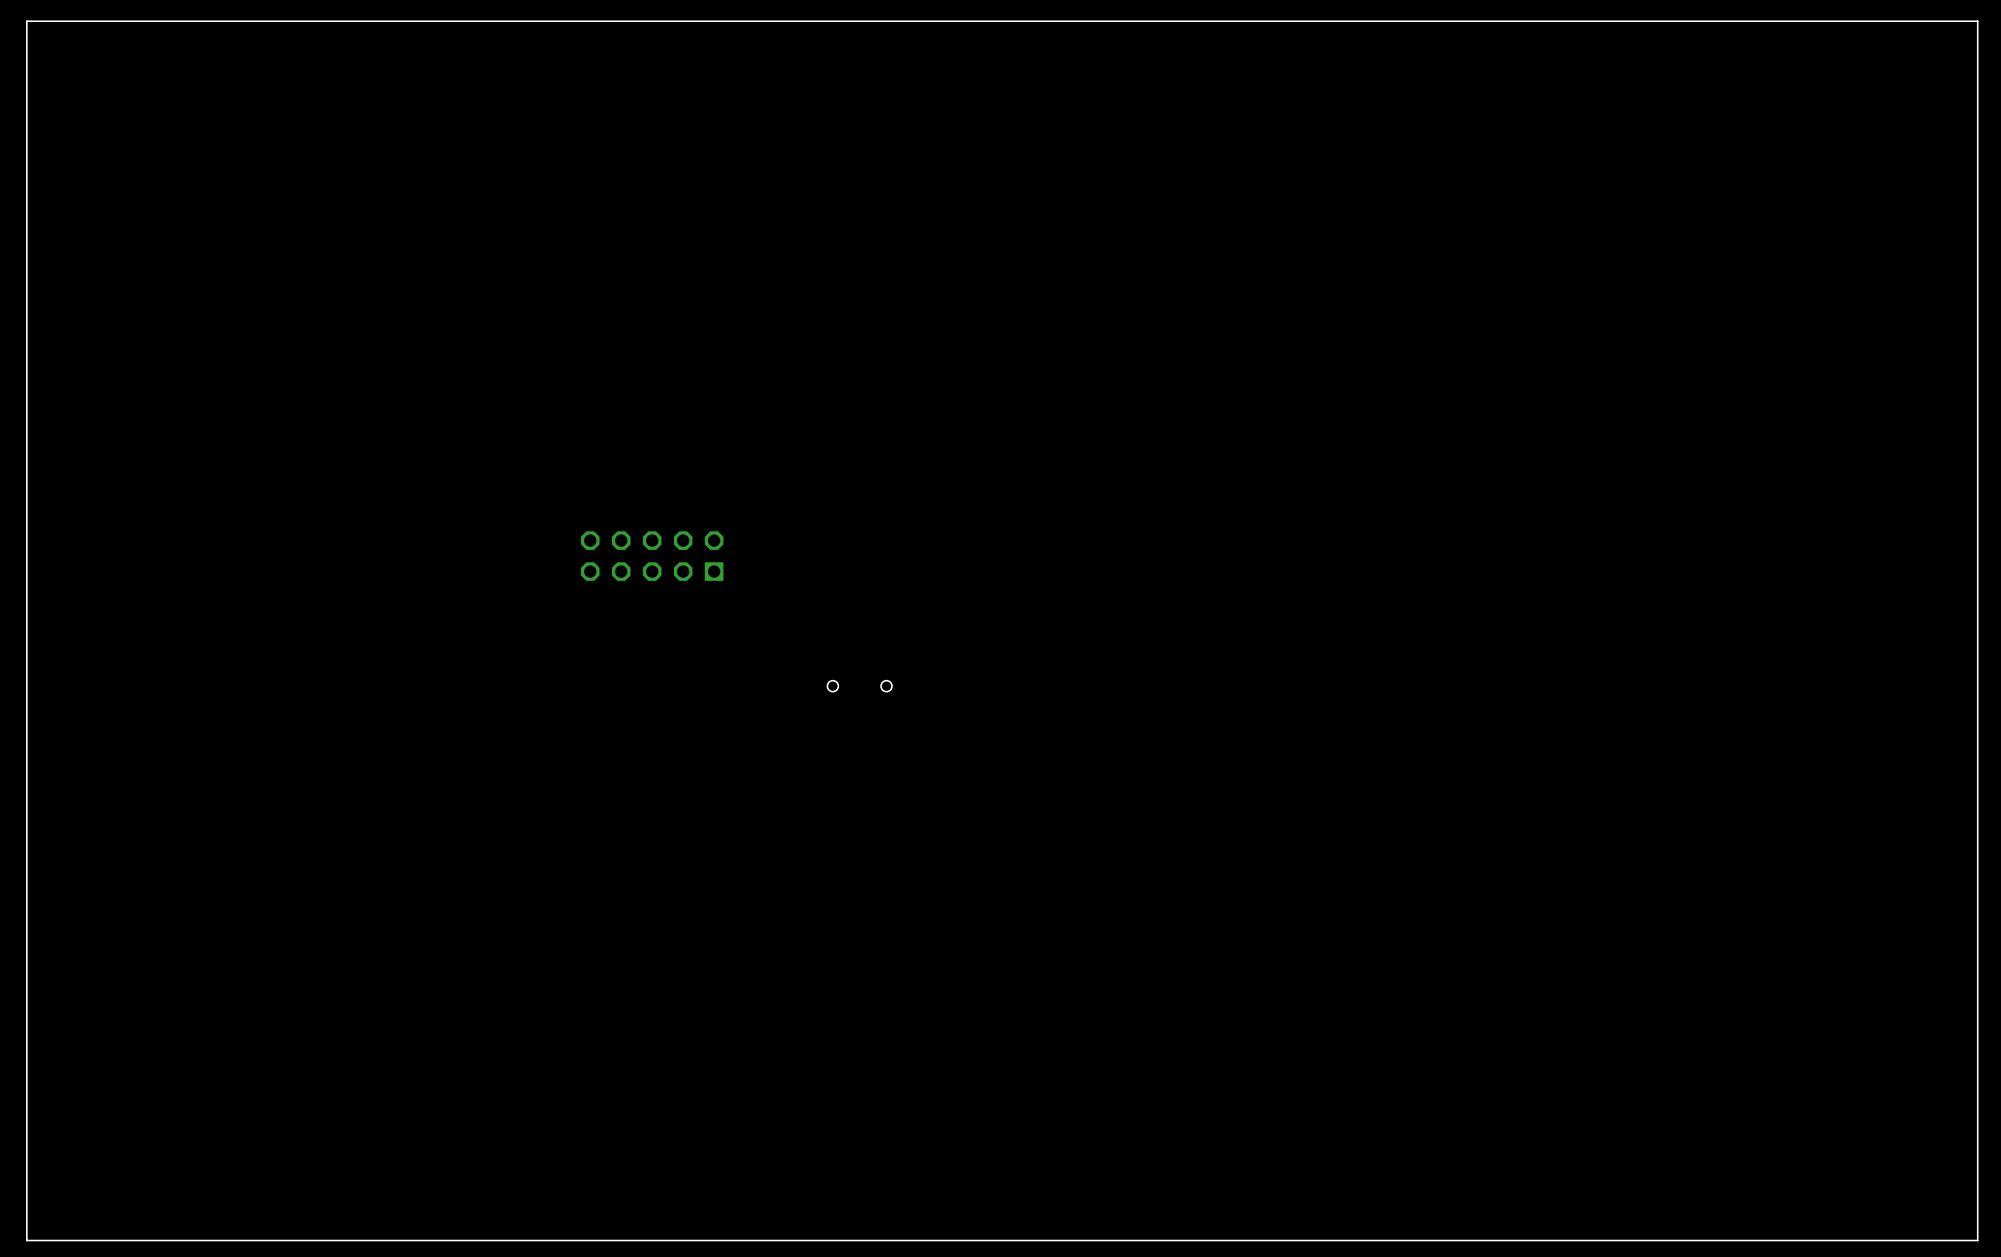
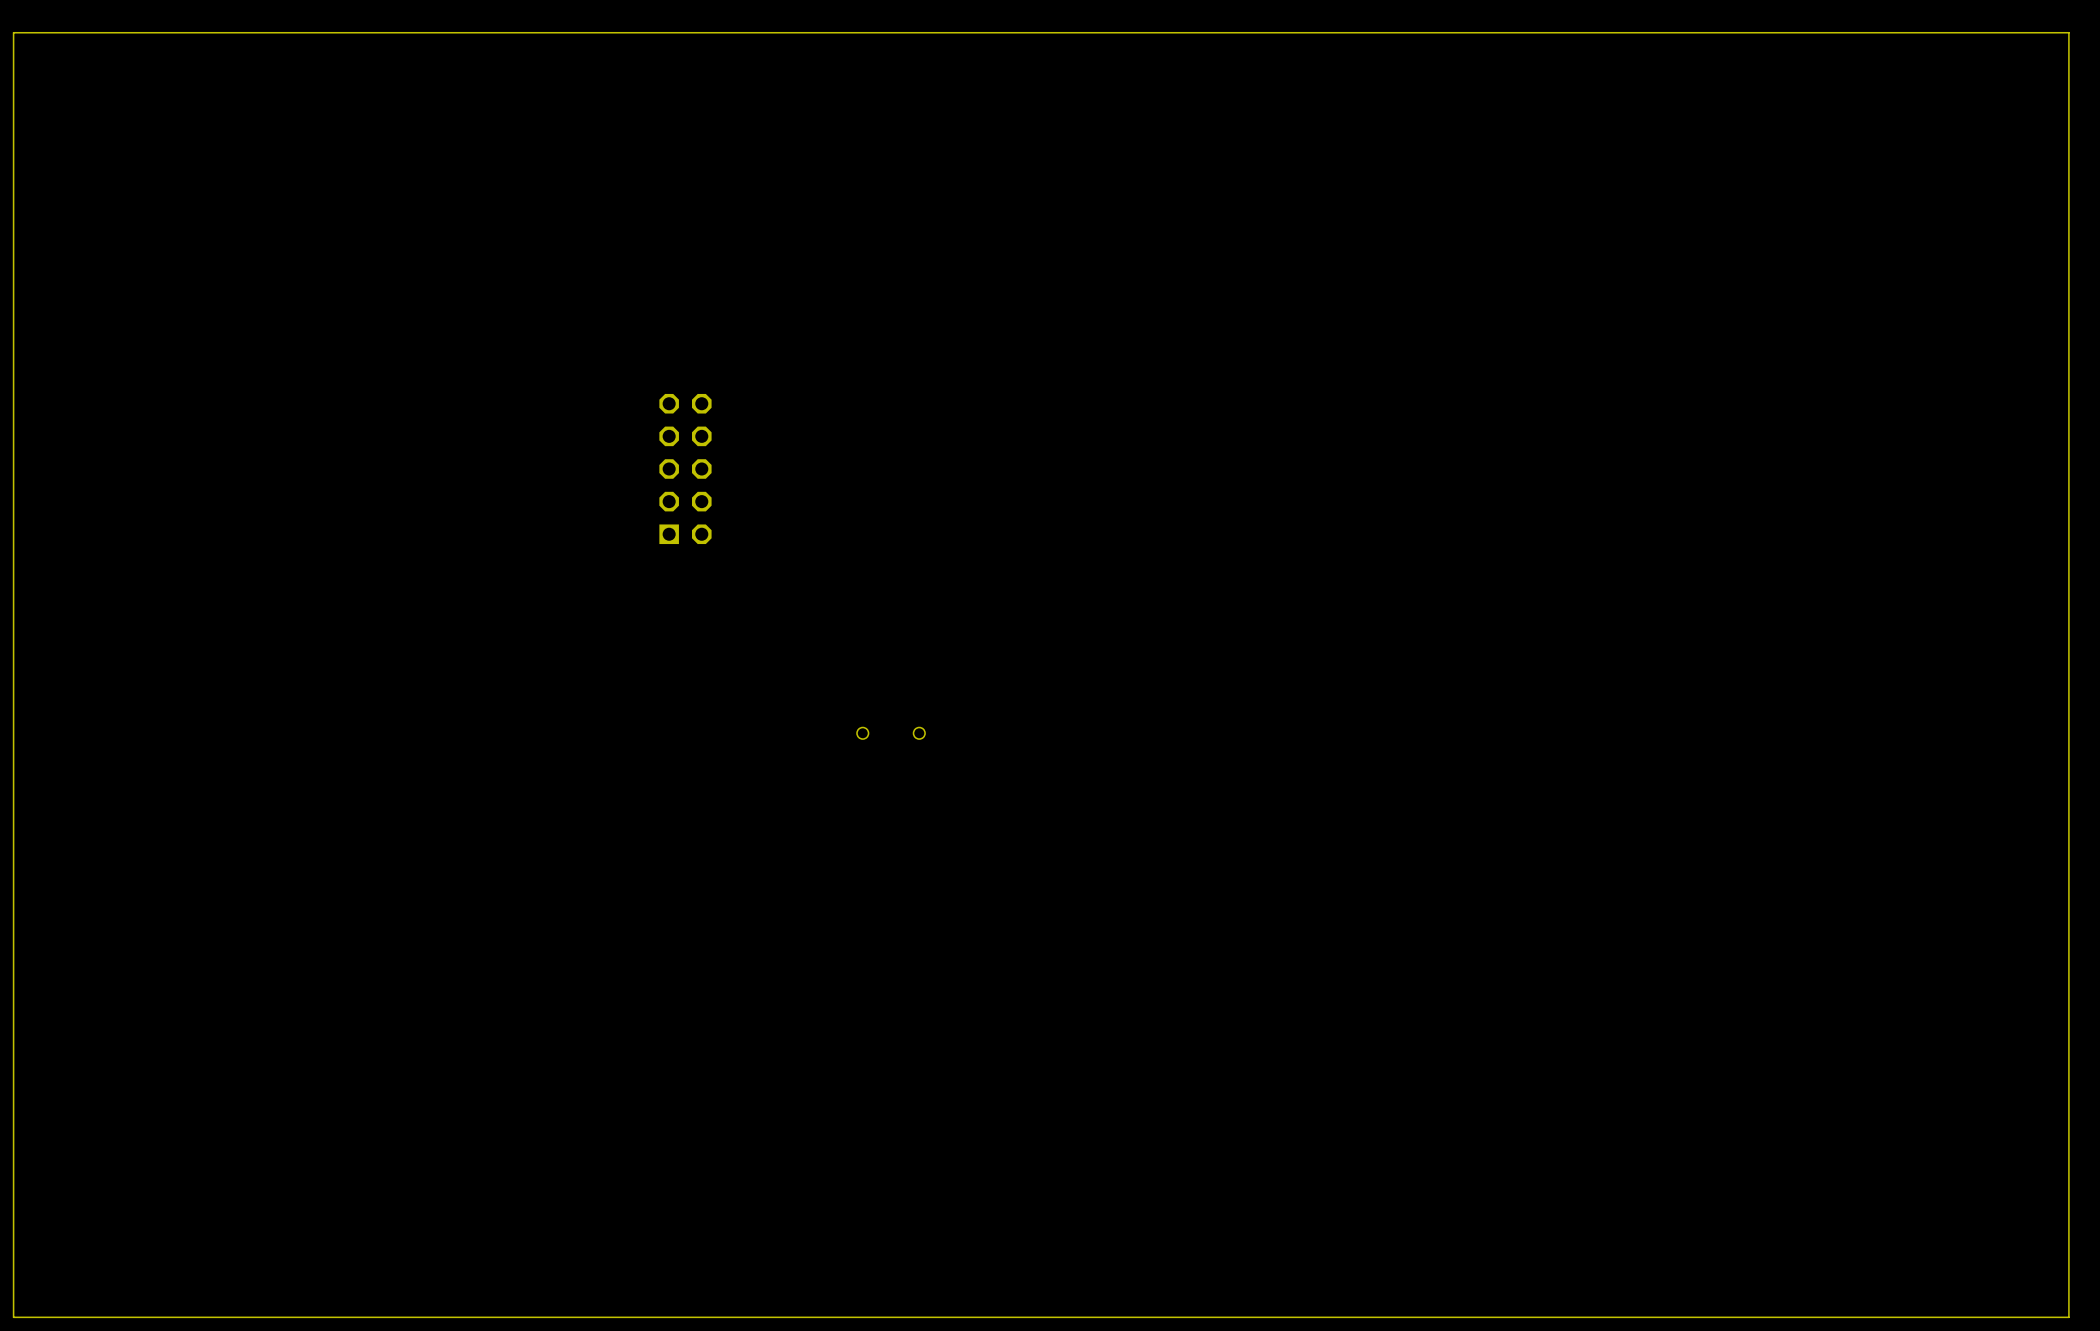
part rotation: 0° (652, 556) -> 90° clockwise (685, 468)
part position: (652, 556) -> (685, 468)

